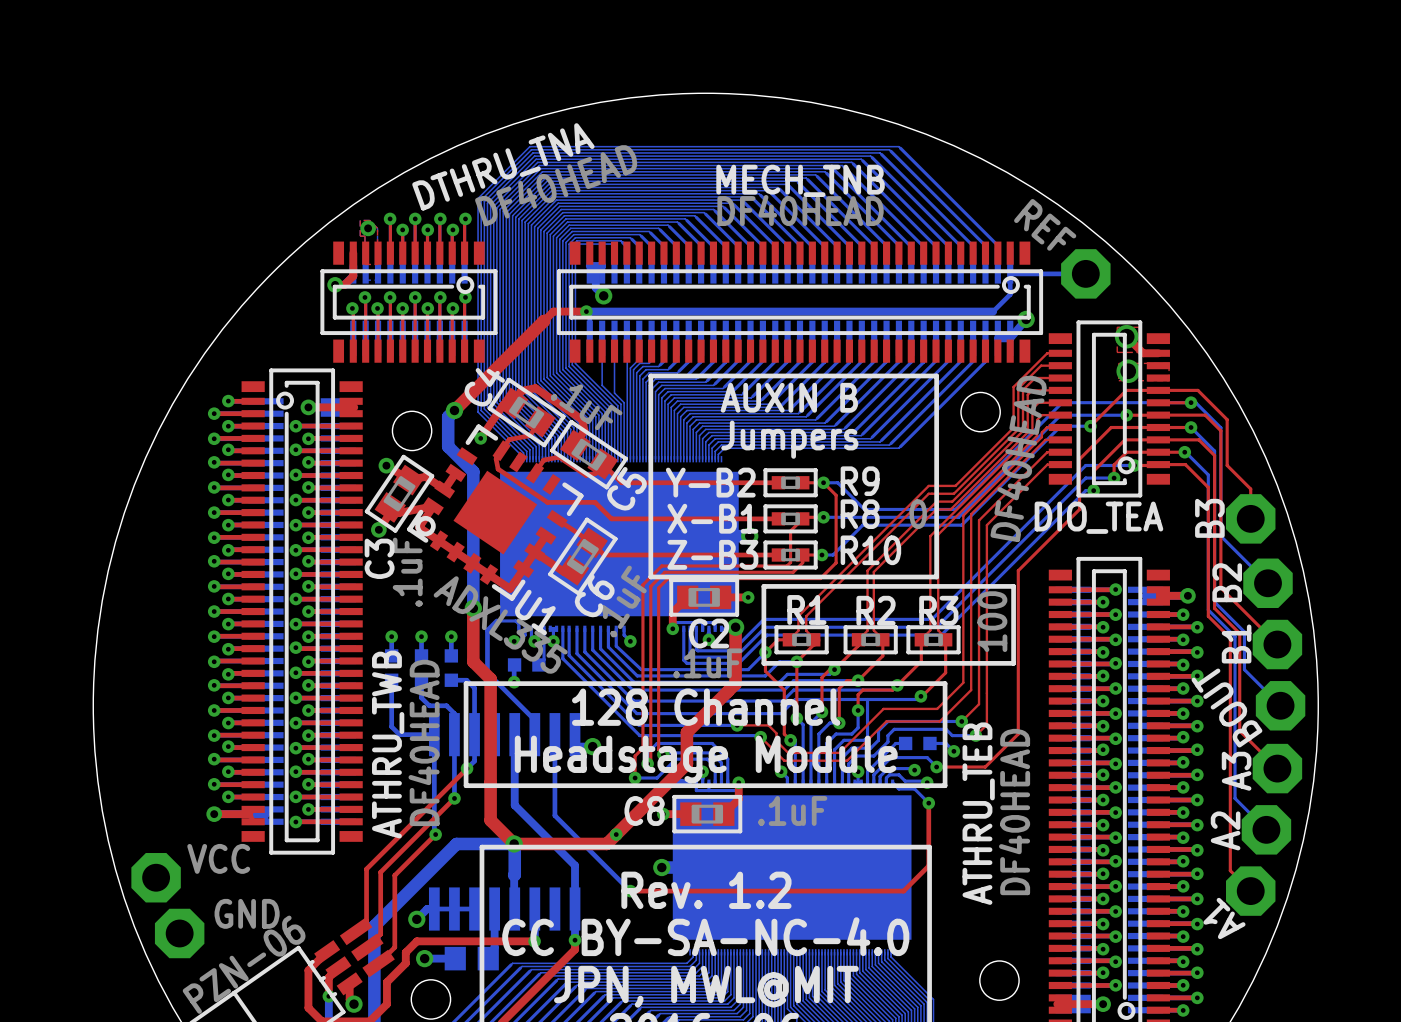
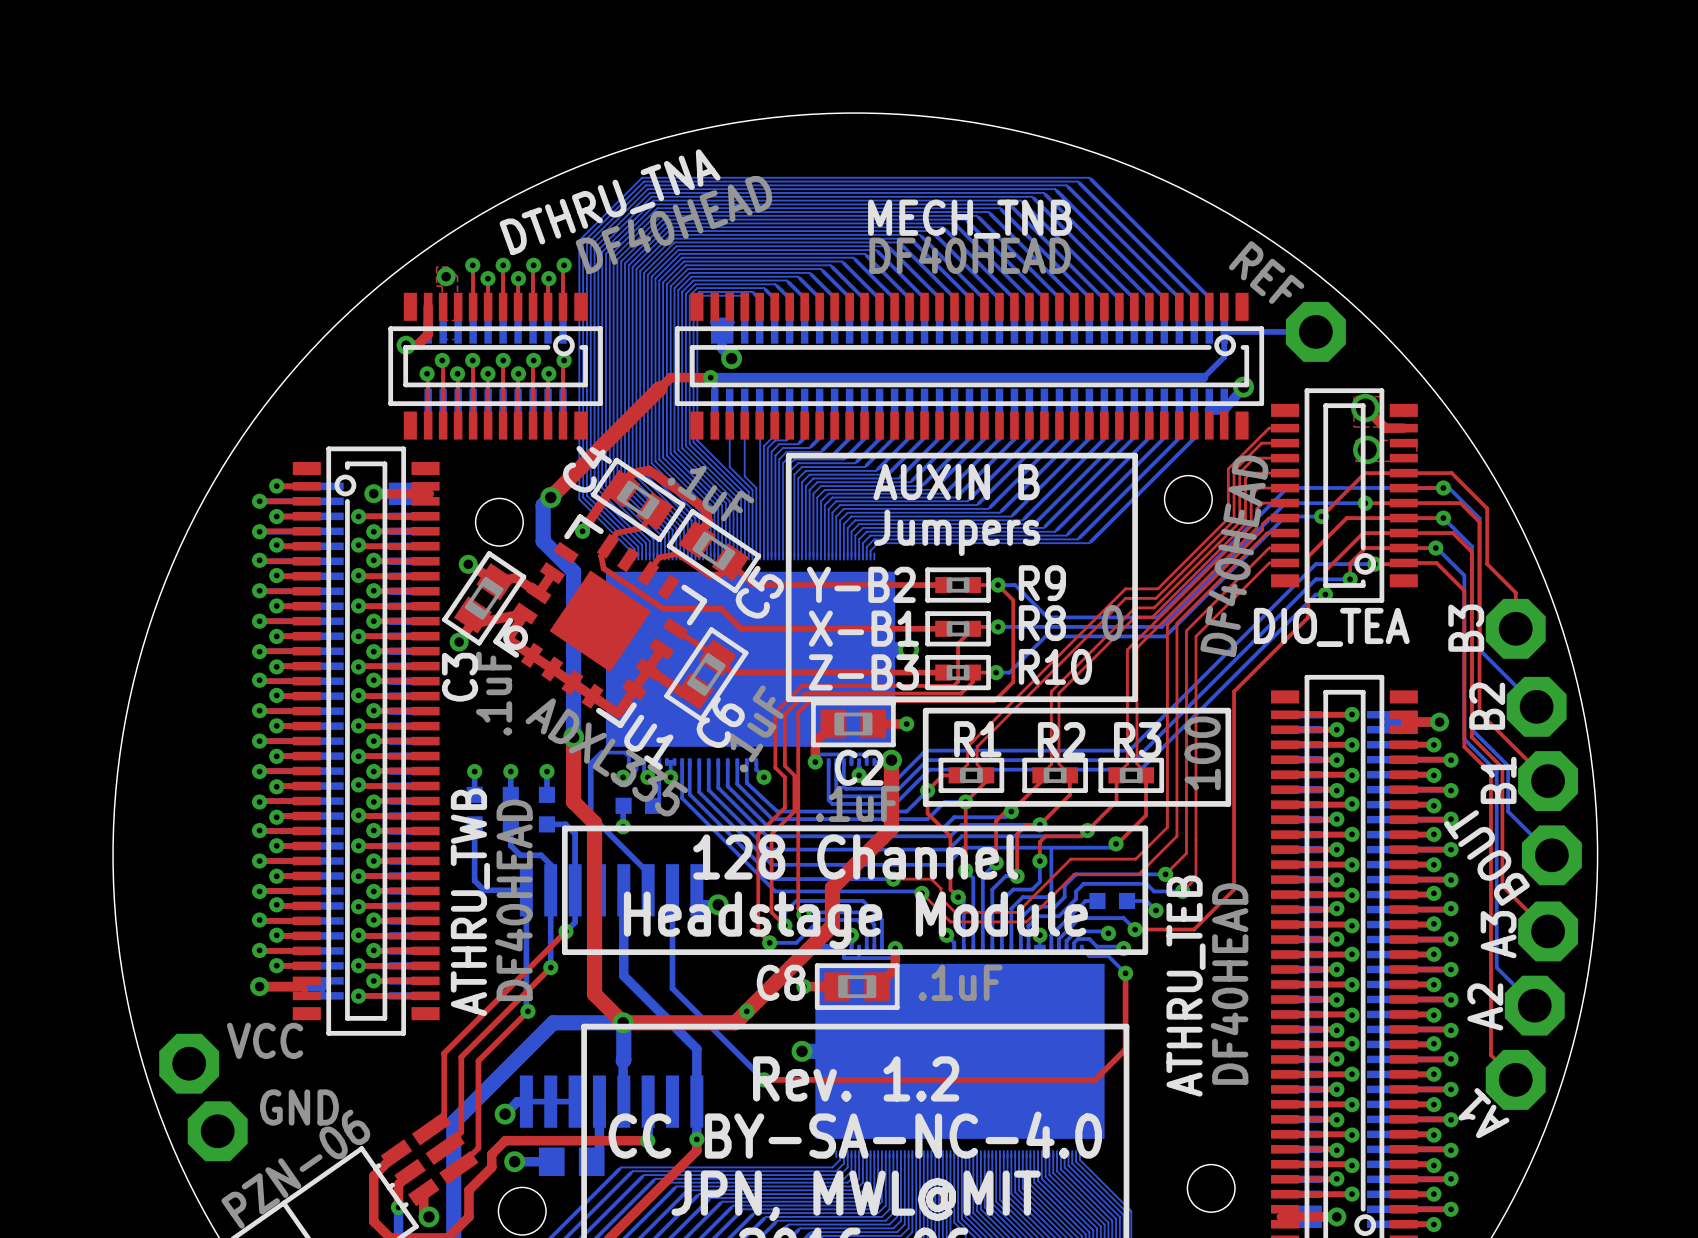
top track: (642, 584) (642, 748) (635, 756) (635, 778) -> (779, 708) (775, 712) (775, 767) (784, 777) (784, 807) (758, 834) (758, 931) (769, 942)
top track: (650, 586) (650, 760) (647, 763) -> (788, 710) (784, 714) (784, 765) (794, 775) (794, 811) (771, 834) (771, 912) (784, 925)

